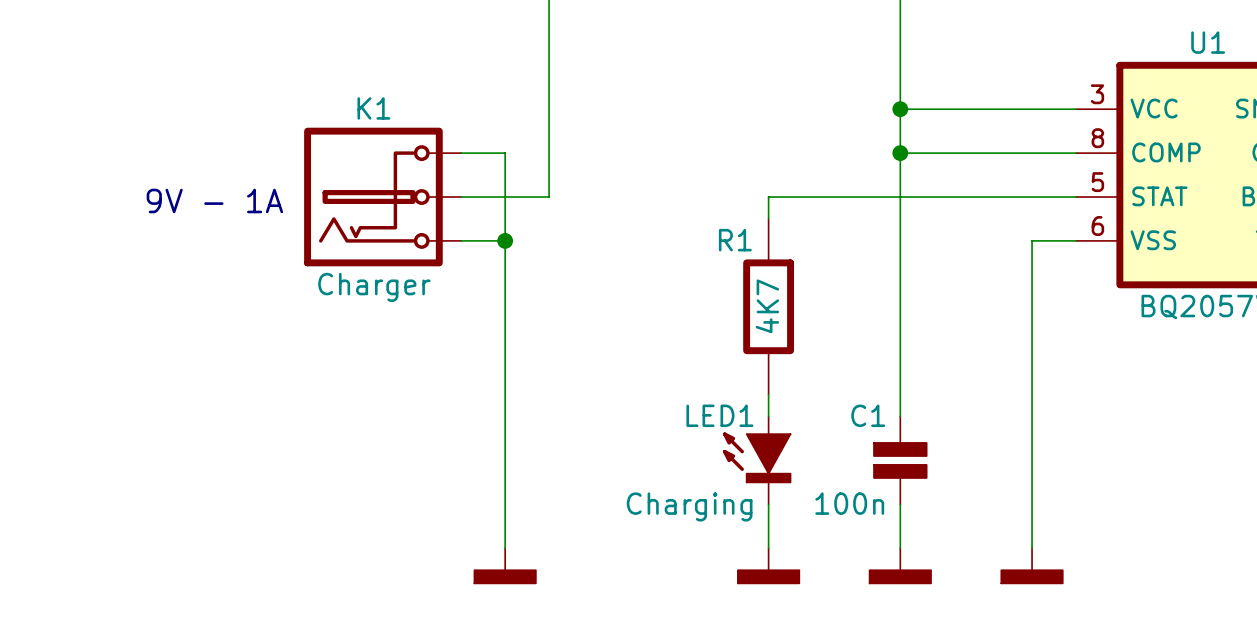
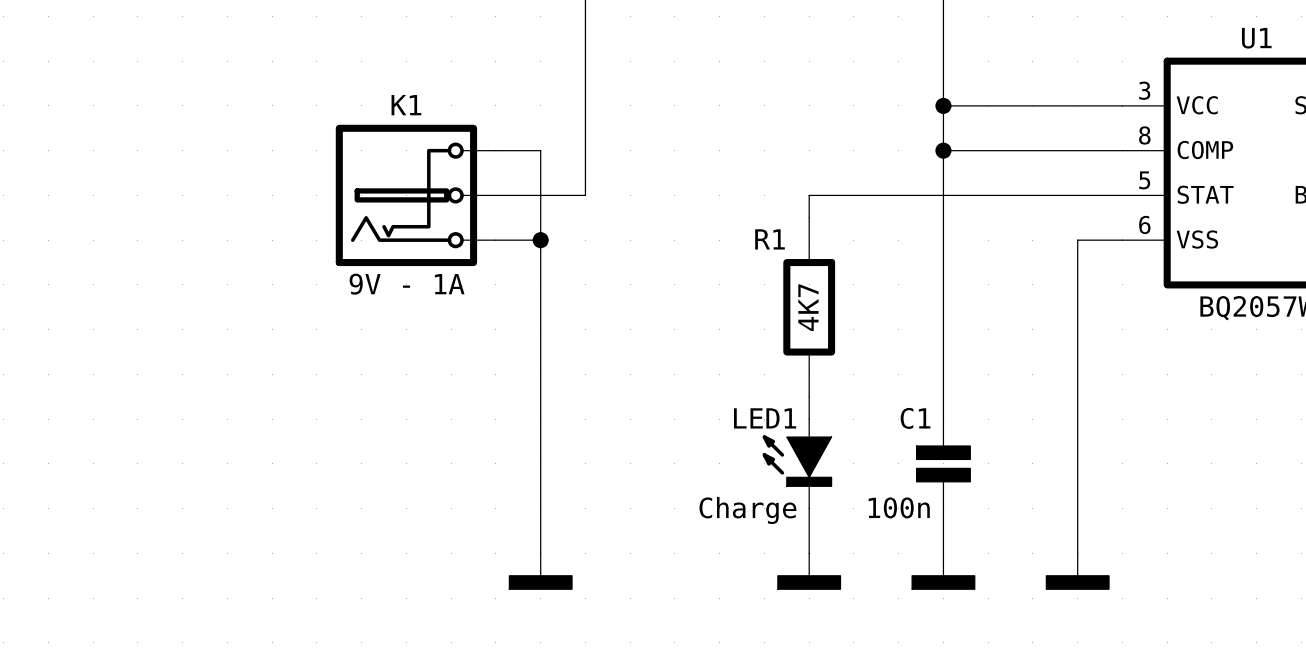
text: 9V - 1A (214, 200) -> none
K1 value: Charger (374, 287) -> 9V - 1A (407, 284)
LED1 value: Charging (689, 506) -> Charge (747, 510)

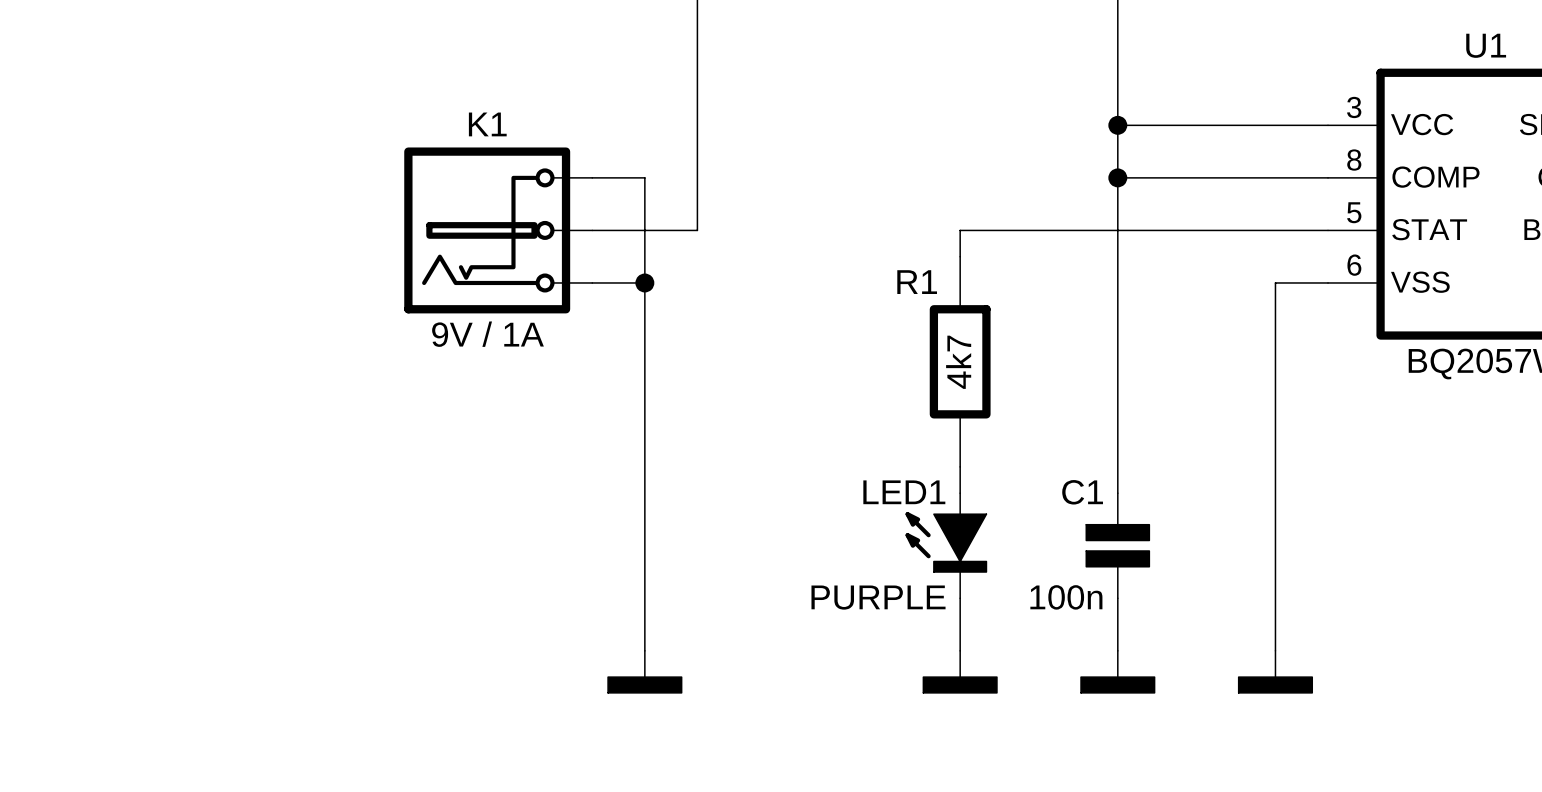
K1 value: 9V - 1A (407, 284) -> 9V / 1A (487, 334)
R1 value: 4K7 (808, 307) -> 4k7 (958, 362)
LED1 value: Charge (747, 510) -> PURPLE (878, 597)

